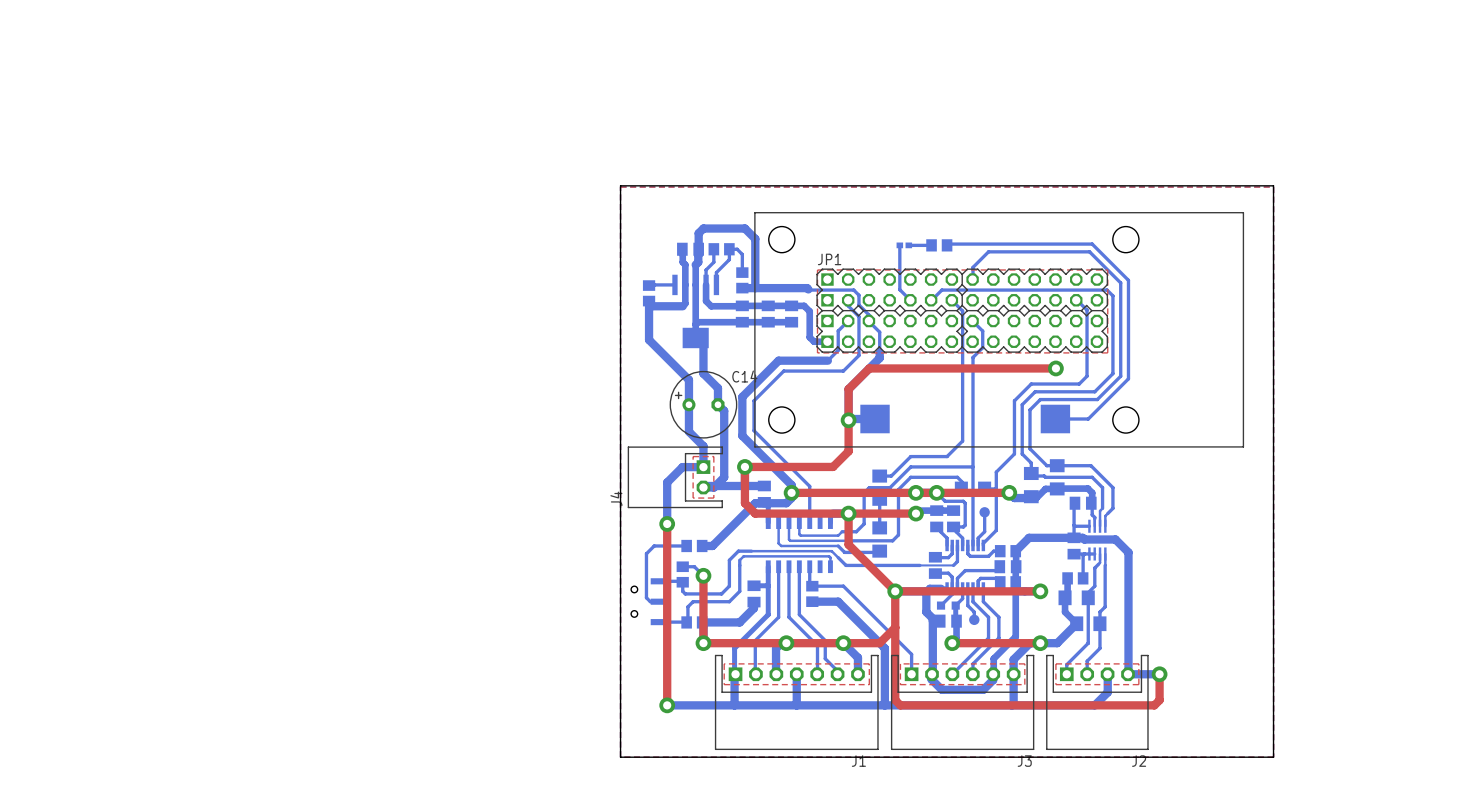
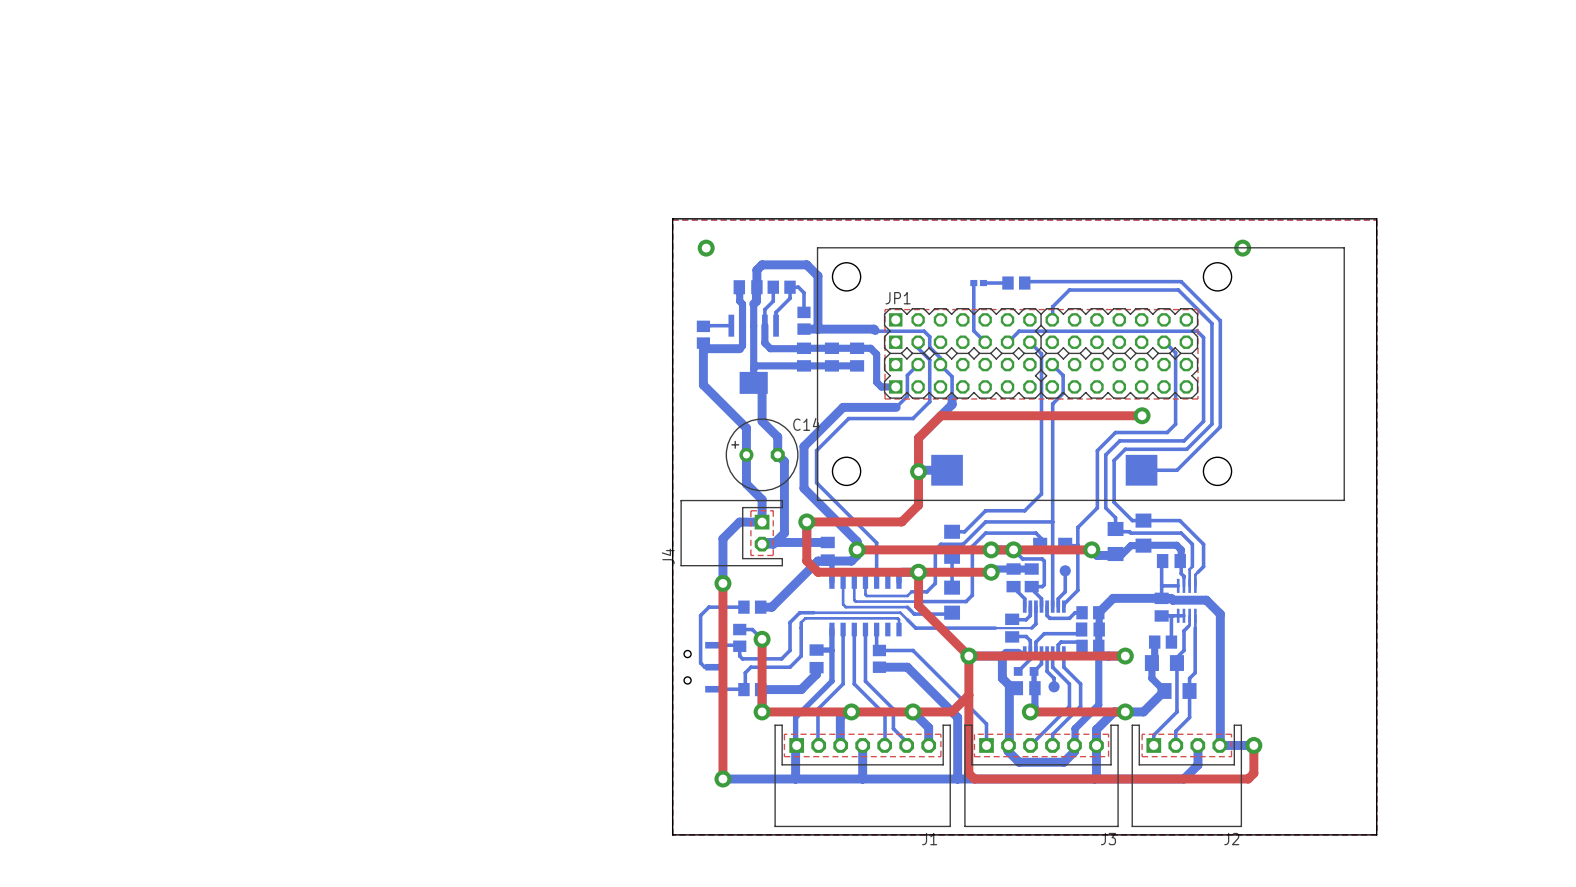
via: none -> (706, 248)
via: none -> (1242, 248)

